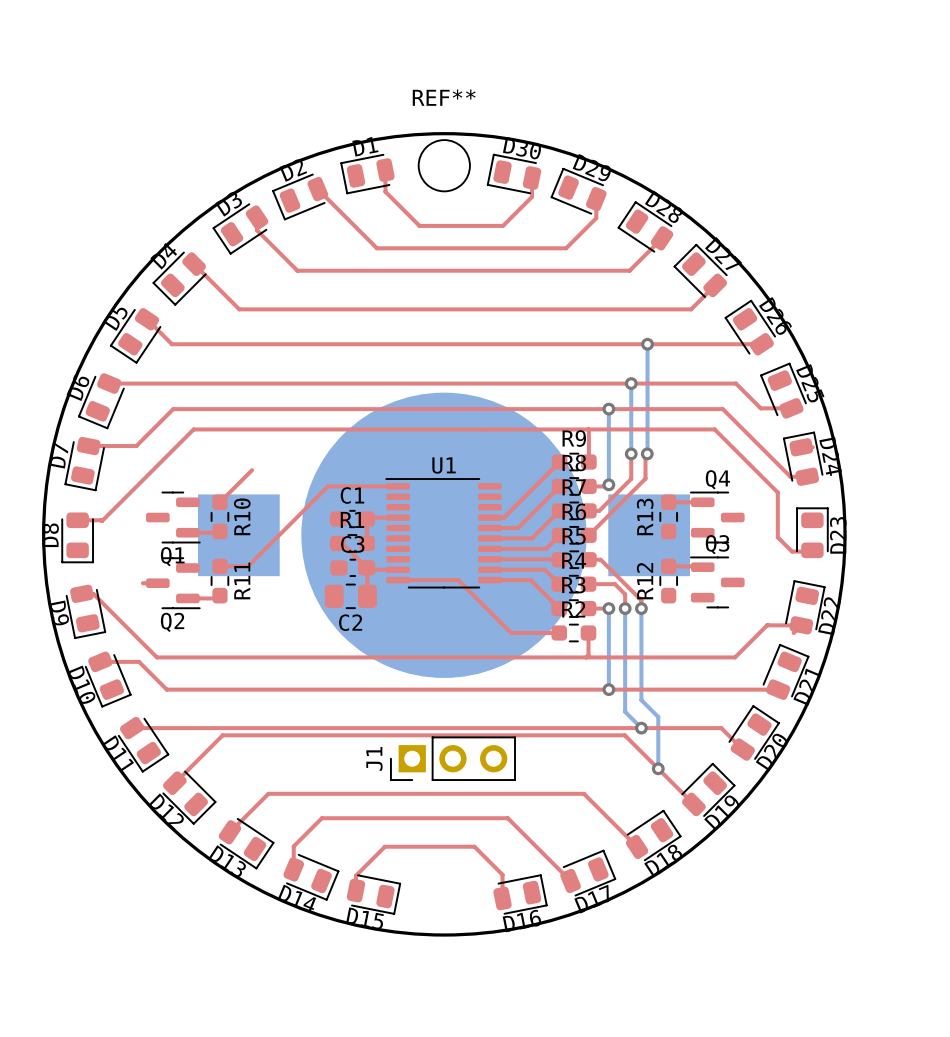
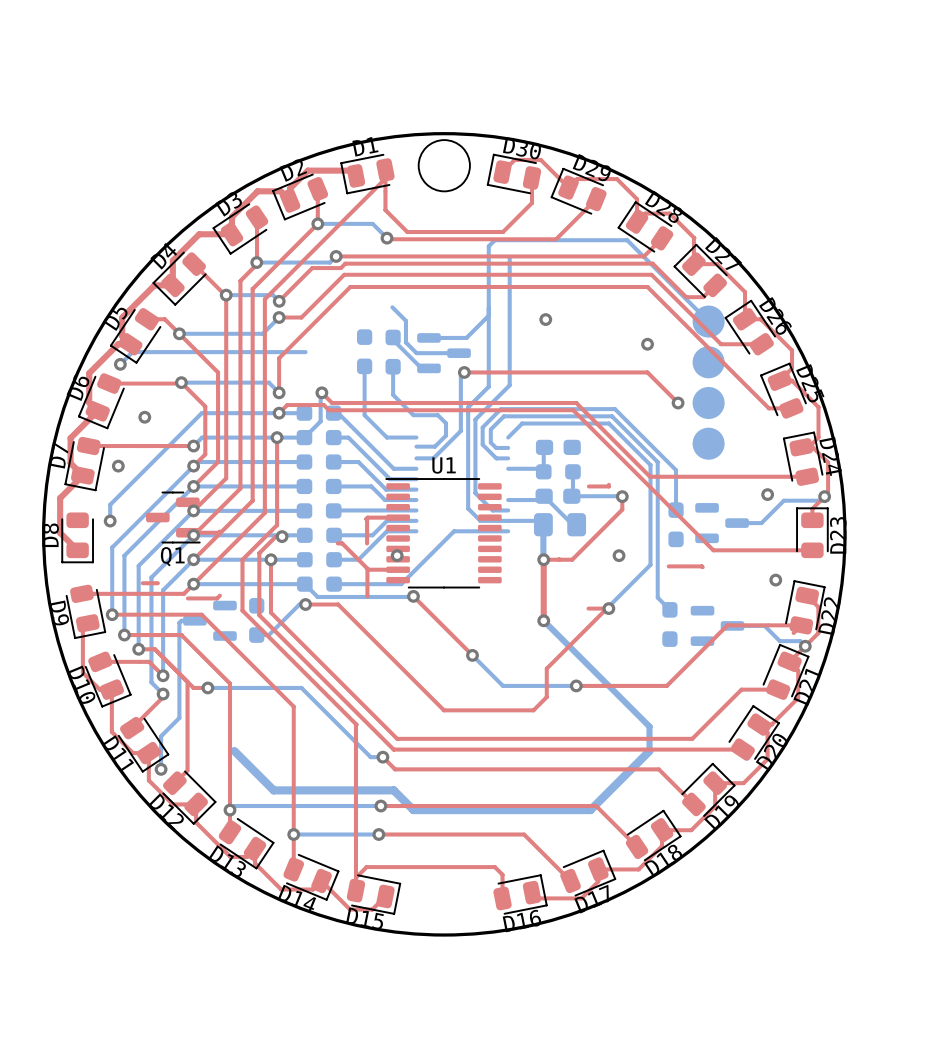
REF** name: REF** (444, 97) -> none
top track: none -> (502, 172) (514, 159) (540, 159) (568, 187) (577, 179) (616, 179) (637, 199) (637, 221) (645, 213) (669, 213) (694, 238) (693, 264) (717, 264) (745, 292) (745, 319) (760, 319) (792, 350) (792, 368) (779, 380) (791, 380) (818, 407) (818, 437) (808, 447) (801, 447)
top track: none -> (355, 175) (350, 170) (307, 170) (290, 188) (290, 200) (280, 191) (257, 191) (232, 216) (232, 234)
top track: none -> (385, 178) (264, 299) (264, 512) (183, 593) (93, 593)
top track: (317, 189) (376, 248) (566, 248) (596, 218) (596, 199) -> (387, 238) (556, 239) (596, 199)
top track: none -> (317, 189) (317, 223) (252, 289) (252, 500) (193, 559)
top track: (385, 191) (419, 225) (503, 225) (532, 196) -> (385, 191) (385, 210) (407, 232) (503, 232) (532, 203) (532, 196)
bottom track: none -> (317, 223) (372, 223) (387, 238)
via: none -> (317, 223)
top track: (257, 230) (297, 270) (629, 270) (643, 256) -> (336, 256) (643, 256)
top track: none -> (257, 230) (257, 264) (240, 280) (240, 488) (193, 535)
top track: none -> (232, 234) (199, 234) (172, 260) (172, 285) (154, 285) (122, 317) (122, 336) (130, 344) (118, 344) (89, 373) (89, 402) (97, 411) (70, 438) (70, 463) (82, 475) (60, 498) (60, 532) (77, 550)
via: none -> (387, 238)
bottom track: none -> (336, 256) (330, 262) (256, 262)
via: none -> (336, 256)
bottom track: none -> (509, 257) (509, 385) (475, 419) (475, 493) (492, 510) (508, 510)
via: none -> (256, 262)
top track: (225, 295) (239, 309) (691, 309) (703, 297) -> (279, 301) (312, 268) (340, 268) (345, 263) (652, 263) (686, 297) (703, 297)
top track: none -> (225, 295) (226, 478) (193, 510)
bottom track: none -> (226, 295) (273, 295) (279, 301)
via: none -> (226, 295)
via: none -> (279, 301)
bottom track: none -> (392, 307) (405, 320) (405, 342) (416, 353) (460, 353)
bottom track: none -> (488, 315) (466, 337) (428, 337)
bottom track: none -> (279, 317) (262, 333) (179, 333)
via: none -> (279, 317)
top track: (147, 319) (172, 344) (721, 344) -> (279, 317) (301, 317) (344, 274) (651, 274) (721, 344)
top track: none -> (147, 319) (164, 319) (218, 372) (218, 462) (193, 486)
via: none -> (545, 319)
bottom track: none -> (708, 321) (627, 240) (494, 240) (488, 246) (488, 386) (468, 407) (468, 508) (480, 520) (539, 520) (543, 524) (543, 560)
part: none -> (708, 321)
via: none -> (179, 333)
bottom track: none -> (393, 337) (393, 339) (421, 368)
bottom track: (647, 344) (647, 453) -> none
bottom track: none -> (305, 352) (132, 352) (120, 364)
part: none -> (393, 352)
part: none -> (444, 353)
part: none -> (708, 362)
via: none -> (120, 364)
bottom track: none -> (364, 366) (364, 415) (386, 437) (416, 437)
bottom track: none -> (393, 366) (393, 394) (413, 415) (437, 415) (446, 423) (446, 435) (434, 446) (416, 446)
top track: none -> (464, 372) (647, 372) (678, 403)
bottom track: none -> (464, 372) (460, 375) (460, 430) (433, 458) (416, 458)
via: none -> (464, 372)
bottom track: none -> (181, 382) (268, 382) (279, 392)
via: none -> (181, 382)
top track: (182, 383) (735, 383) (760, 408) (768, 408) -> (279, 392) (279, 358) (350, 286) (647, 286) (768, 408)
top track: none -> (182, 383) (205, 406) (205, 454) (193, 466)
bottom track: (631, 383) (631, 453) -> none
via: (631, 383) -> none
via: none -> (279, 392)
bottom track: none -> (321, 392) (320, 421) (304, 437) (202, 437) (193, 446)
via: none -> (321, 392)
via: none -> (678, 403)
part: none -> (708, 403)
bottom track: (608, 409) (608, 484) -> none
via: (608, 409) -> none
via: none -> (279, 413)
bottom track: none -> (304, 413) (201, 413) (110, 504) (110, 521)
bottom track: none -> (333, 413) (338, 413) (393, 468) (416, 468)
via: none -> (144, 417)
top track: (588, 429) (588, 462) -> none
top track: none -> (277, 437) (277, 525) (242, 559) (242, 610) (356, 724) (355, 875)
via: none -> (277, 437)
bottom track: none -> (333, 437) (348, 437) (390, 479) (416, 479)
bottom track: none -> (508, 437) (522, 423) (609, 423) (650, 465) (650, 564) (606, 608)
part: none -> (708, 443)
top track: (136, 446) (173, 409) (722, 409) (790, 476) -> (321, 392) (332, 403) (576, 403) (650, 476) (790, 476)
top track: none -> (136, 446) (193, 446)
via: none -> (193, 446)
bottom track: none -> (543, 446) (543, 471) (540, 468) (508, 468)
bottom track: none -> (508, 447) (496, 447) (490, 442) (490, 429) (503, 416) (611, 416) (657, 462) (657, 597) (669, 609)
top track: none -> (812, 447) (828, 462) (828, 493) (812, 508) (812, 520)
top track: (631, 453) (631, 478) (599, 510) (588, 510) -> none
via: (631, 453) -> none
top track: (647, 453) (645, 453) (645, 478) (588, 535) -> none
via: (647, 453) -> none
bottom track: none -> (508, 458) (496, 458) (482, 444) (482, 427) (500, 409) (614, 409) (676, 470) (676, 510)
bottom track: none -> (304, 462) (197, 462) (112, 547) (112, 614)
bottom track: none -> (333, 462) (358, 462) (386, 489) (416, 489)
top track: (559, 462) (504, 517) (489, 517) -> none
R9 side: top (574, 462) -> bottom (319, 413)
via: none -> (118, 466)
via: none -> (193, 466)
top track: (252, 470) (219, 502) -> none
bottom track: none -> (568, 471) (572, 471) (571, 496) (622, 496)
via position: (608, 484) -> (622, 496)
via: none -> (193, 486)
bottom track: none -> (304, 486) (193, 486) (124, 555) (124, 635)
bottom track: none -> (333, 486) (371, 486) (384, 500) (416, 500)
top track: (398, 486) (328, 486) (248, 566) (219, 566) -> none
top track: (559, 486) (518, 528) (489, 528) -> none
R8 side: top (574, 486) -> bottom (319, 437)
via: none -> (767, 494)
top track: none -> (622, 496) (622, 509) (572, 559) (543, 559) (543, 620)
bottom track: none -> (824, 496) (820, 500) (783, 500) (761, 523) (737, 523)
via: none -> (824, 496)
bottom track: none -> (508, 500) (540, 500) (544, 496) (572, 524) (576, 524)
top track: (668, 502) (702, 502) -> none
via: none -> (193, 510)
bottom track: none -> (304, 510) (193, 510) (138, 565) (138, 649)
bottom track: none -> (416, 510) (333, 510)
top track: (559, 510) (532, 538) (489, 538) -> none
R7 side: top (574, 510) -> bottom (319, 462)
R10 side: top (219, 516) -> bottom (364, 351)
R13 side: top (668, 516) -> bottom (676, 524)
Q4 side: top (717, 517) -> bottom (722, 523)
C1 side: top (352, 519) -> bottom (558, 447)
top track: (77, 520) (102, 521) (193, 429) (714, 429) (777, 492) (777, 537) (792, 551) (816, 551) (812, 550) -> (279, 413) (287, 405) (323, 405) (329, 410) (573, 410) (713, 550) (812, 550)
bottom track: none -> (416, 520) (387, 520) (372, 535) (334, 535)
via: none -> (110, 521)
bottom track: none -> (416, 531) (386, 531) (358, 559) (334, 559)
bottom track: none -> (508, 531) (454, 531) (401, 584) (334, 584)
via: none -> (193, 535)
bottom track: none -> (304, 535) (193, 535) (151, 577) (151, 682) (163, 694)
part: (444, 535) -> none
top track: (559, 535) (546, 548) (489, 548) -> none
R6 side: top (574, 535) -> bottom (319, 486)
via: none -> (282, 536)
R1 side: top (352, 543) -> bottom (558, 471)
via: none -> (397, 555)
via: none -> (619, 555)
via: none -> (193, 559)
via: none -> (270, 559)
bottom track: none -> (304, 559) (193, 559) (163, 590) (163, 675)
top track: (489, 559) (559, 559) -> none
via: none -> (543, 559)
R5 side: top (574, 559) -> bottom (319, 510)
top track: (588, 559) (600, 559) (641, 600) (641, 608) -> none
C3 side: top (352, 567) -> bottom (557, 496)
top track: (489, 569) (544, 569) (559, 584) -> none
top track: (398, 580) (458, 580) (511, 633) (559, 633) -> none
top track: (489, 580) (530, 580) (559, 608) -> none
via: none -> (775, 580)
R11 side: top (219, 581) -> bottom (256, 620)
R12 side: top (668, 581) -> bottom (669, 624)
Q3 side: top (717, 582) -> bottom (717, 625)
Q2 side: top (173, 583) -> bottom (209, 620)
bottom track: none -> (193, 584) (304, 584) (317, 597) (413, 597)
via: none -> (193, 584)
R4 side: top (573, 584) -> bottom (319, 535)
top track: (588, 584) (614, 584) (625, 594) (625, 608) -> none
top track: (93, 593) (156, 657) (735, 657) (768, 625) -> (576, 685) (666, 685) (727, 625) (768, 625)
top track: none -> (807, 595) (818, 607) (818, 633) (789, 661) (798, 670) (798, 698) (771, 724) (759, 724) (767, 732) (767, 759) (743, 783) (715, 783) (715, 806) (691, 830) (662, 830) (662, 846) (638, 869) (598, 869) (598, 881) (581, 898) (537, 898) (532, 892)
C2 side: top (350, 596) -> bottom (560, 524)
top track: none -> (413, 596) (472, 655)
via: none -> (413, 596)
top track: none -> (305, 604) (338, 604) (444, 710) (533, 710) (546, 697) (546, 668) (606, 608)
bottom track: none -> (305, 604) (299, 604) (268, 635) (256, 635)
via: none -> (305, 604)
R3 side: top (573, 608) -> bottom (319, 559)
bottom track: (608, 608) (608, 689) -> none
bottom track: (625, 608) (625, 711) (641, 728) -> none
via: (625, 608) -> none
bottom track: (641, 608) (641, 700) (658, 717) (658, 768) -> none
via: (641, 608) -> none
top track: none -> (112, 614) (201, 614) (293, 706) (293, 846)
via: none -> (112, 614)
bottom track: none -> (194, 620) (181, 620) (179, 622) (179, 717) (161, 736) (161, 769)
bottom track: none -> (543, 620) (649, 726) (649, 751) (590, 810) (413, 810) (393, 790) (273, 790) (234, 751)
via: none -> (543, 620)
top track: none -> (87, 623) (82, 628) (82, 672) (99, 689) (111, 689) (111, 731) (133, 753) (148, 753) (148, 780) (172, 804) (196, 804) (196, 822) (230, 857) (246, 857) (254, 848) (254, 863) (281, 889) (312, 889) (321, 880) (350, 909) (372, 909) (385, 896)
bottom track: none -> (732, 625) (764, 625) (779, 641) (800, 641) (805, 646)
R2 side: top (573, 633) -> bottom (319, 584)
top track: (588, 633) (588, 655) (586, 657) -> none
top track: none -> (124, 635) (181, 635) (230, 683) (230, 832)
via: none -> (124, 635)
via: none -> (805, 646)
top track: none -> (138, 649) (154, 649) (193, 687) (207, 687)
via: none -> (138, 649)
bottom track: none -> (472, 655) (503, 685) (576, 685)
via: none -> (472, 655)
top track: (139, 661) (166, 689) (741, 689) -> (273, 561) (270, 559) (270, 612) (397, 738) (692, 738) (741, 689)
top track: none -> (139, 661) (149, 661) (163, 675)
via: none -> (163, 675)
top track: none -> (187, 681) (187, 770)
bottom track: none -> (207, 687) (301, 687) (370, 757) (382, 757)
via: none -> (207, 687)
via position: (608, 689) -> (576, 685)
top track: none -> (163, 694) (163, 697) (132, 728)
via: none -> (163, 694)
top track: (132, 728) (721, 728) (742, 749) -> (282, 536) (275, 536) (259, 553) (259, 615) (393, 749) (742, 749)
via: (641, 728) -> none
via: none -> (382, 757)
J1: (452, 758) -> none
via: (658, 768) -> none
via: none -> (161, 769)
top track: (658, 769) (624, 735) (222, 735) (187, 770) -> (658, 769) (395, 769) (382, 757)
bottom track: none -> (380, 806) (234, 806) (230, 810)
via: none -> (380, 806)
top track: (596, 806) (583, 793) (268, 793) (230, 832) -> (596, 806) (380, 806)
via: none -> (230, 810)
bottom track: none -> (293, 834) (378, 834)
via: none -> (293, 834)
via: none -> (378, 834)
top track: (524, 834) (507, 818) (321, 818) (293, 846) -> (524, 834) (378, 834)
top track: (494, 867) (474, 846) (384, 846) (355, 875) -> (494, 867) (366, 867) (355, 877)

